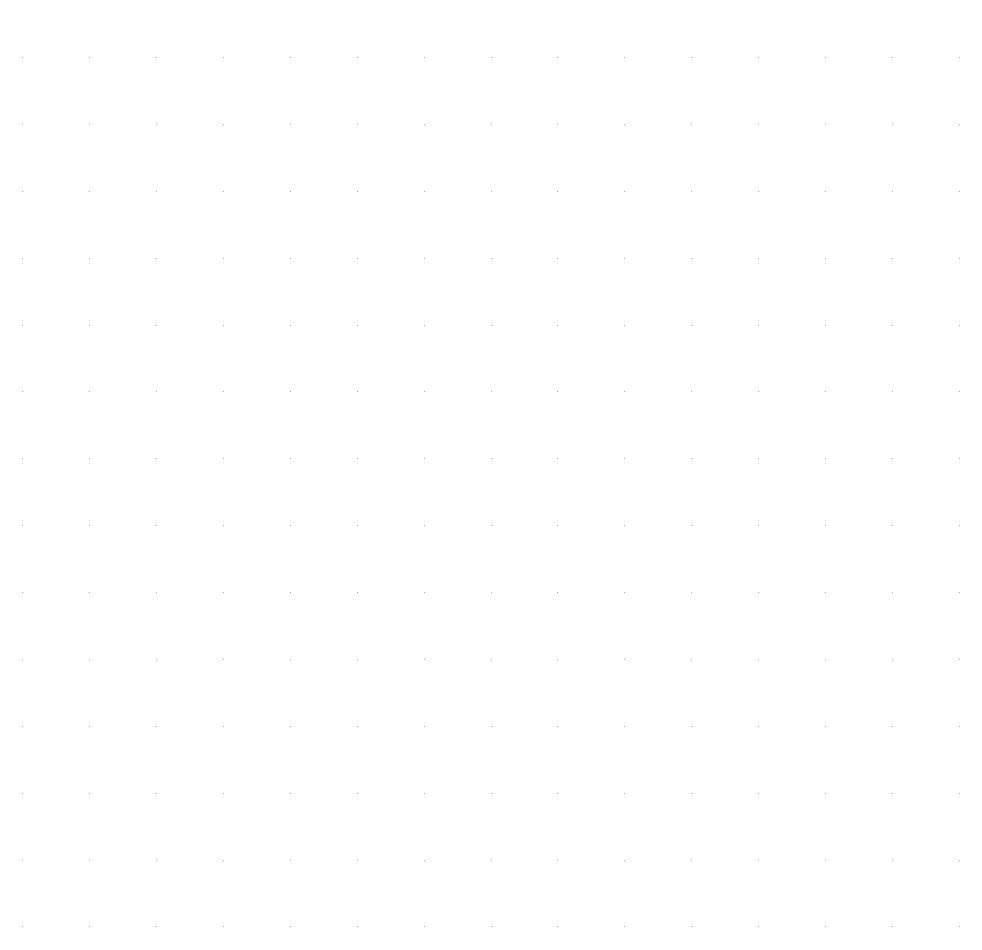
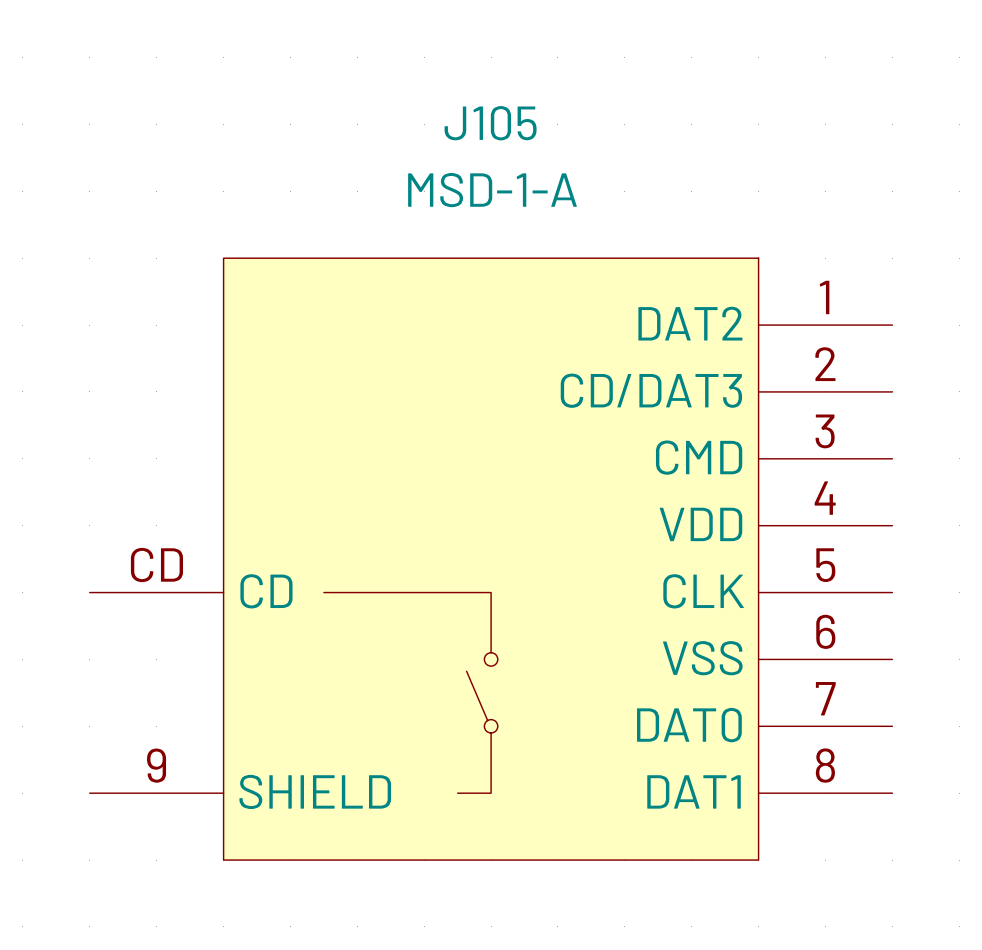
J105: none -> MSD-1-A (491, 559)

